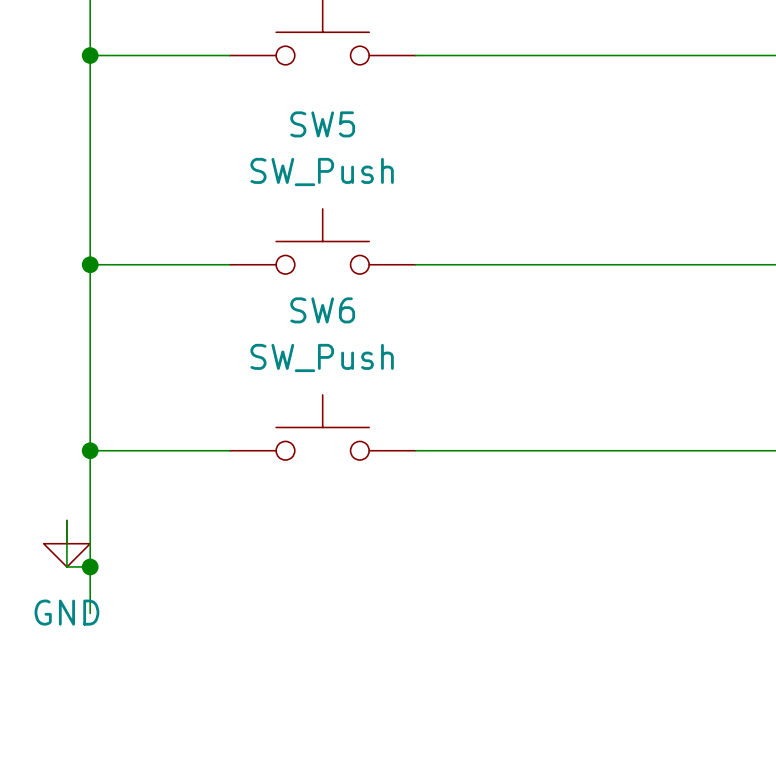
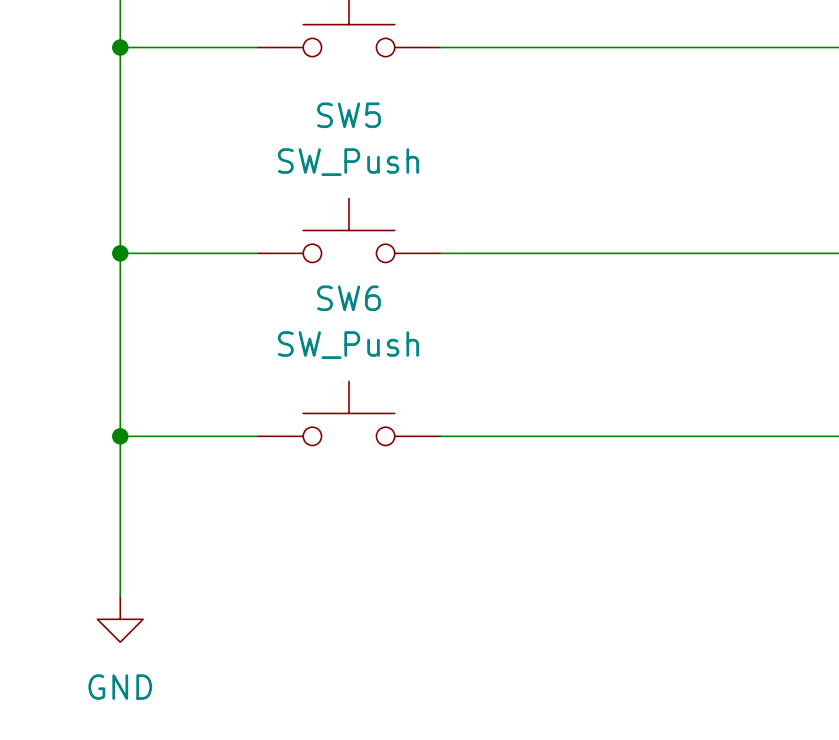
wire: (66, 520) (66, 566) (90, 566) -> none
power symbol position: GND (66, 543) -> GND (120, 619)
junction: (90, 566) -> none

